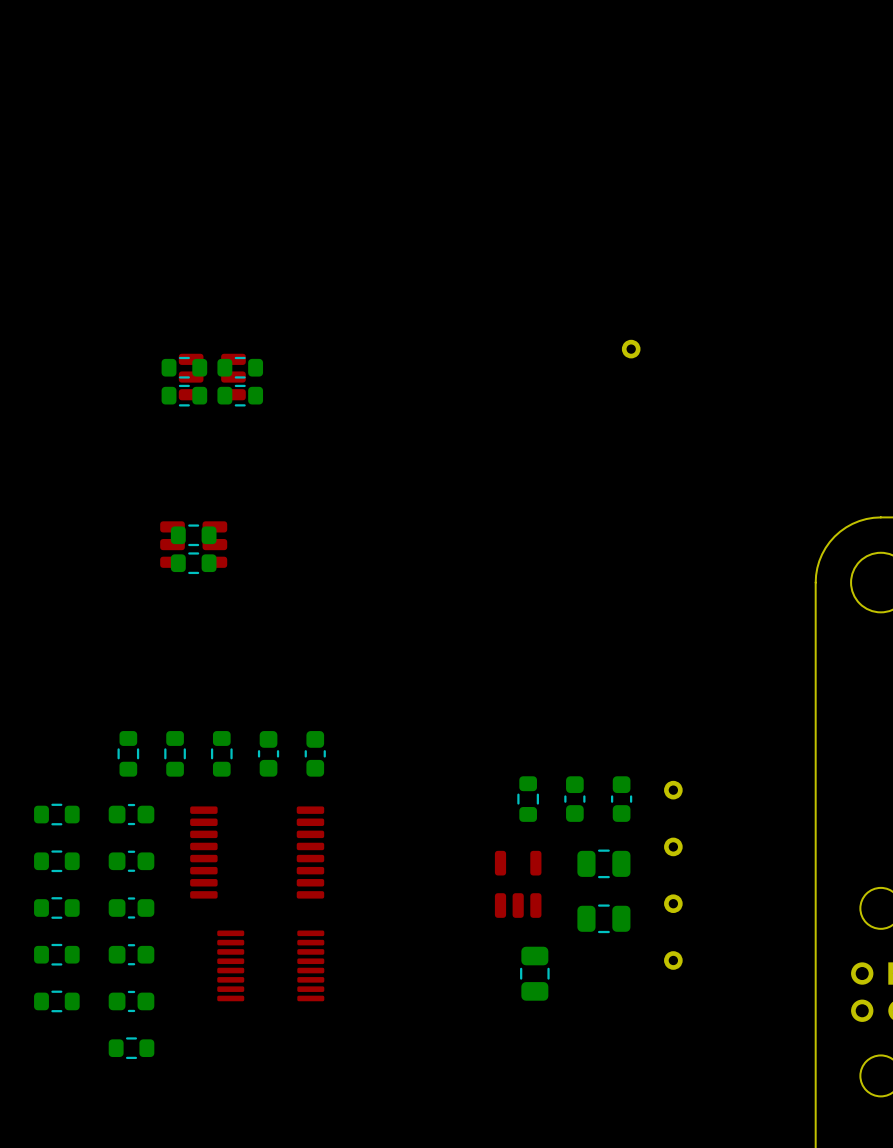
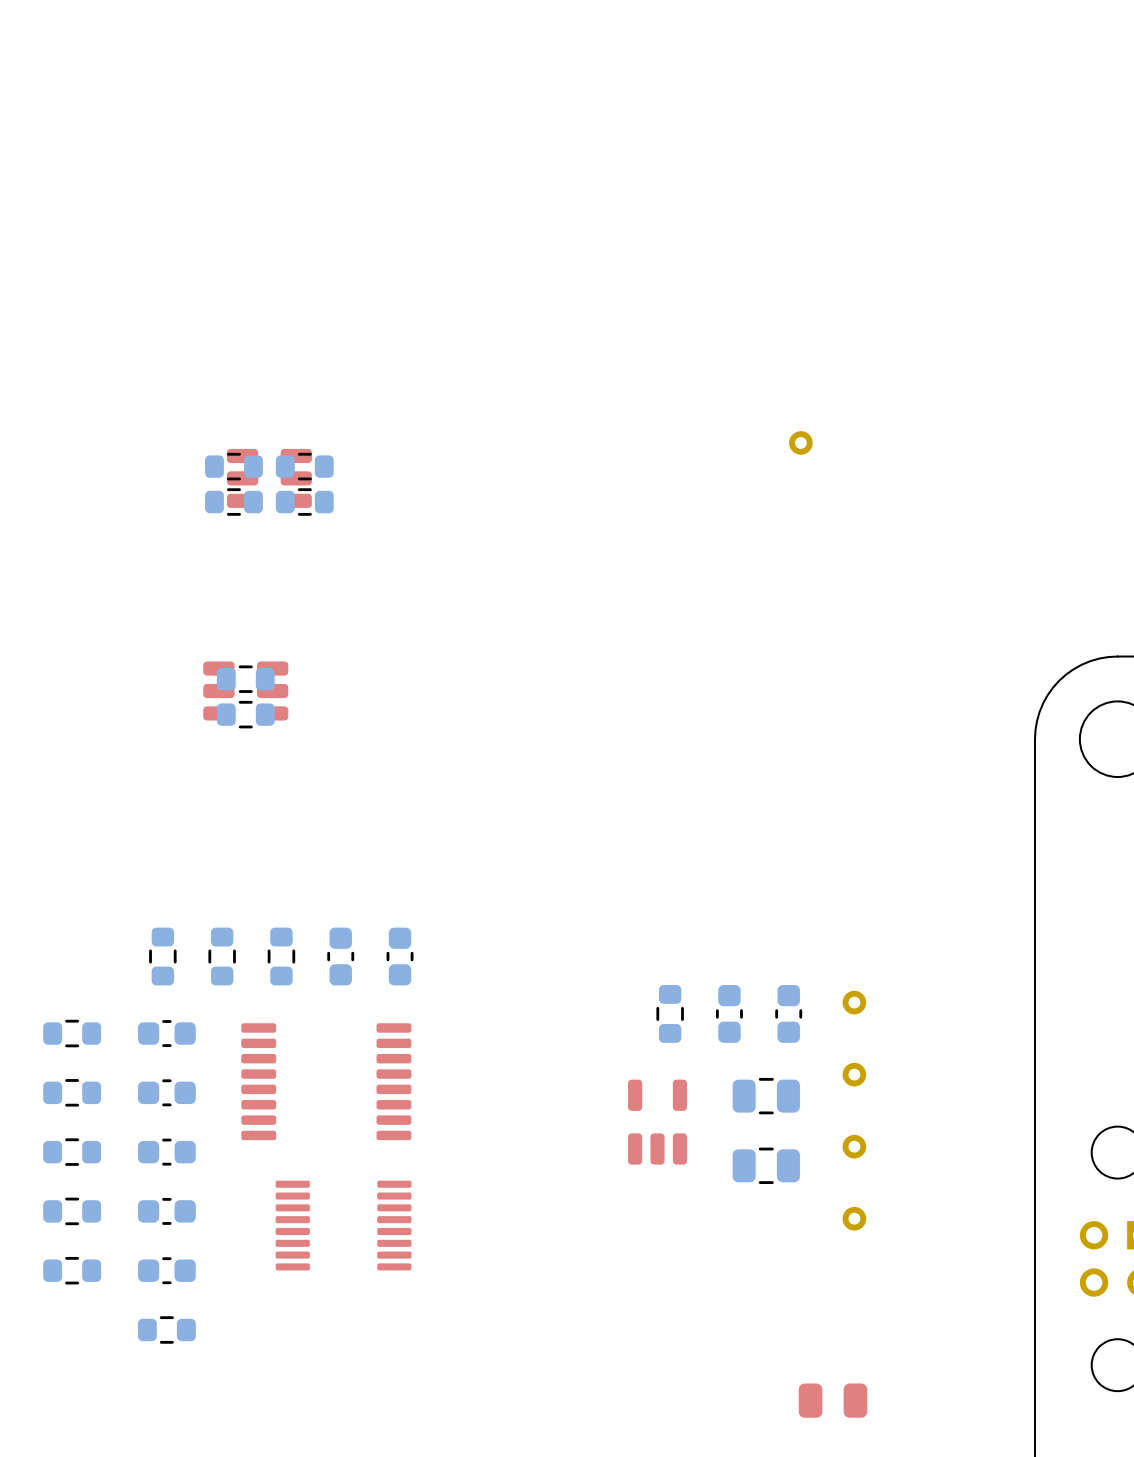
part: (534, 973) -> none
part: none -> (833, 1400)

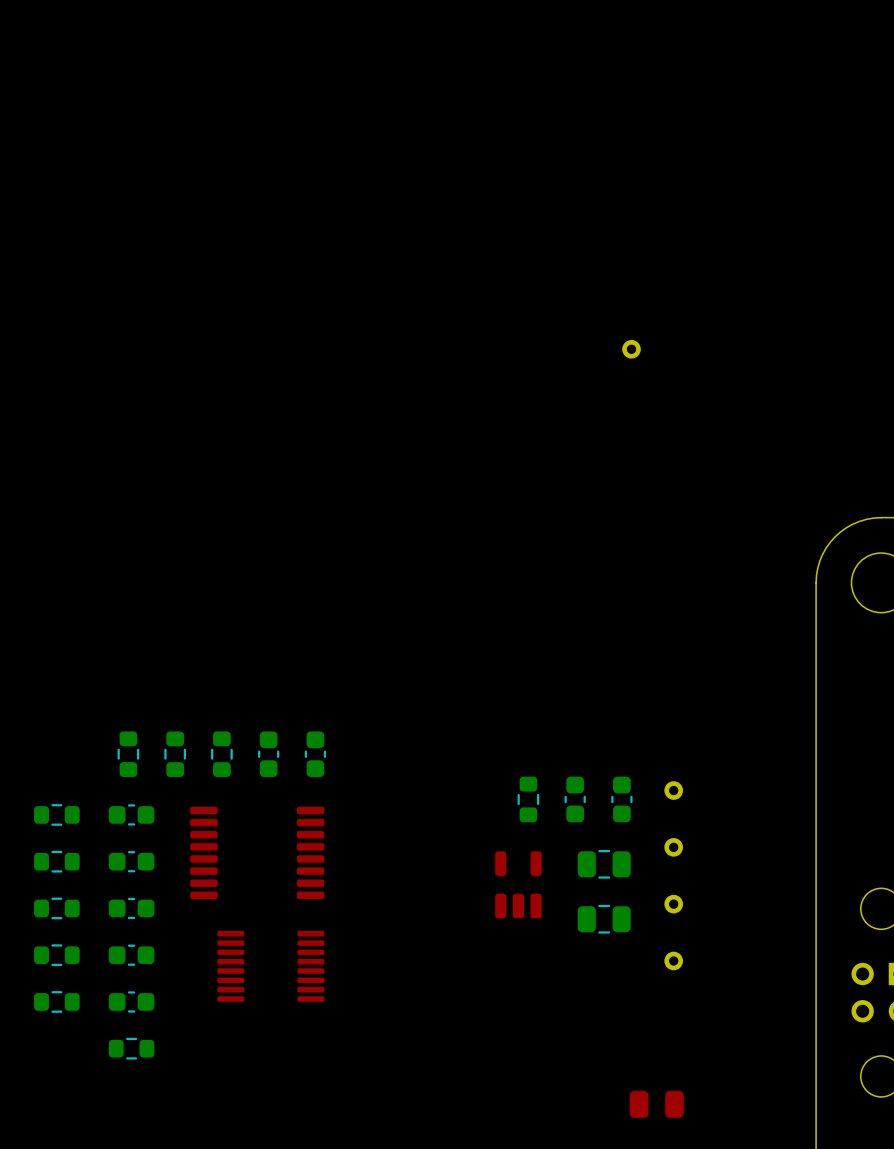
part: (233, 466) -> none
part: (304, 466) -> none
part: (269, 478) -> none
part: (233, 502) -> none
part: (304, 502) -> none
part: (245, 679) -> none
part: (245, 691) -> none
part: (245, 714) -> none

